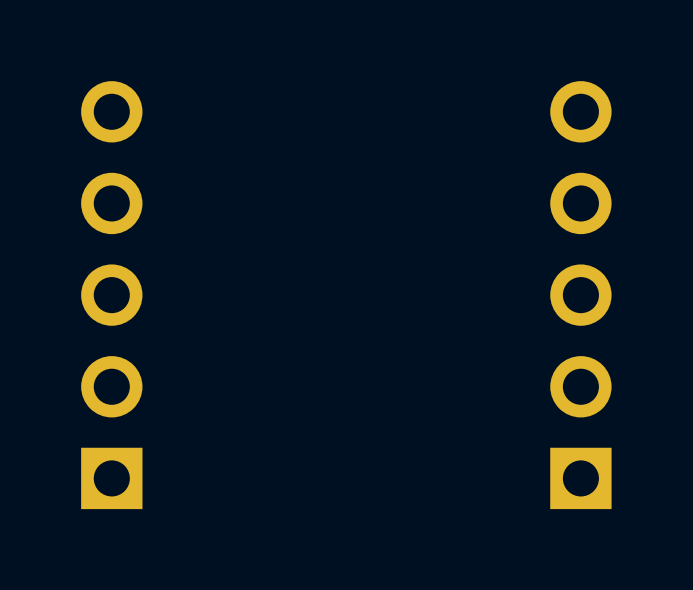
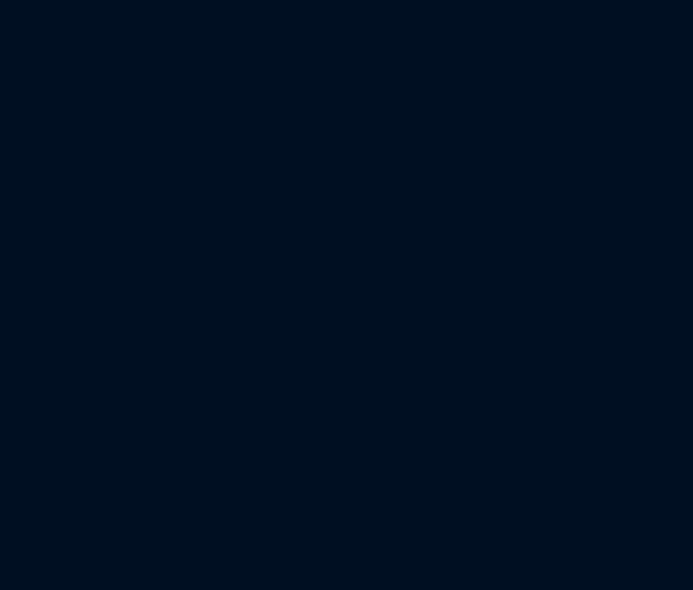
part: (111, 295) -> none
part: (580, 295) -> none

